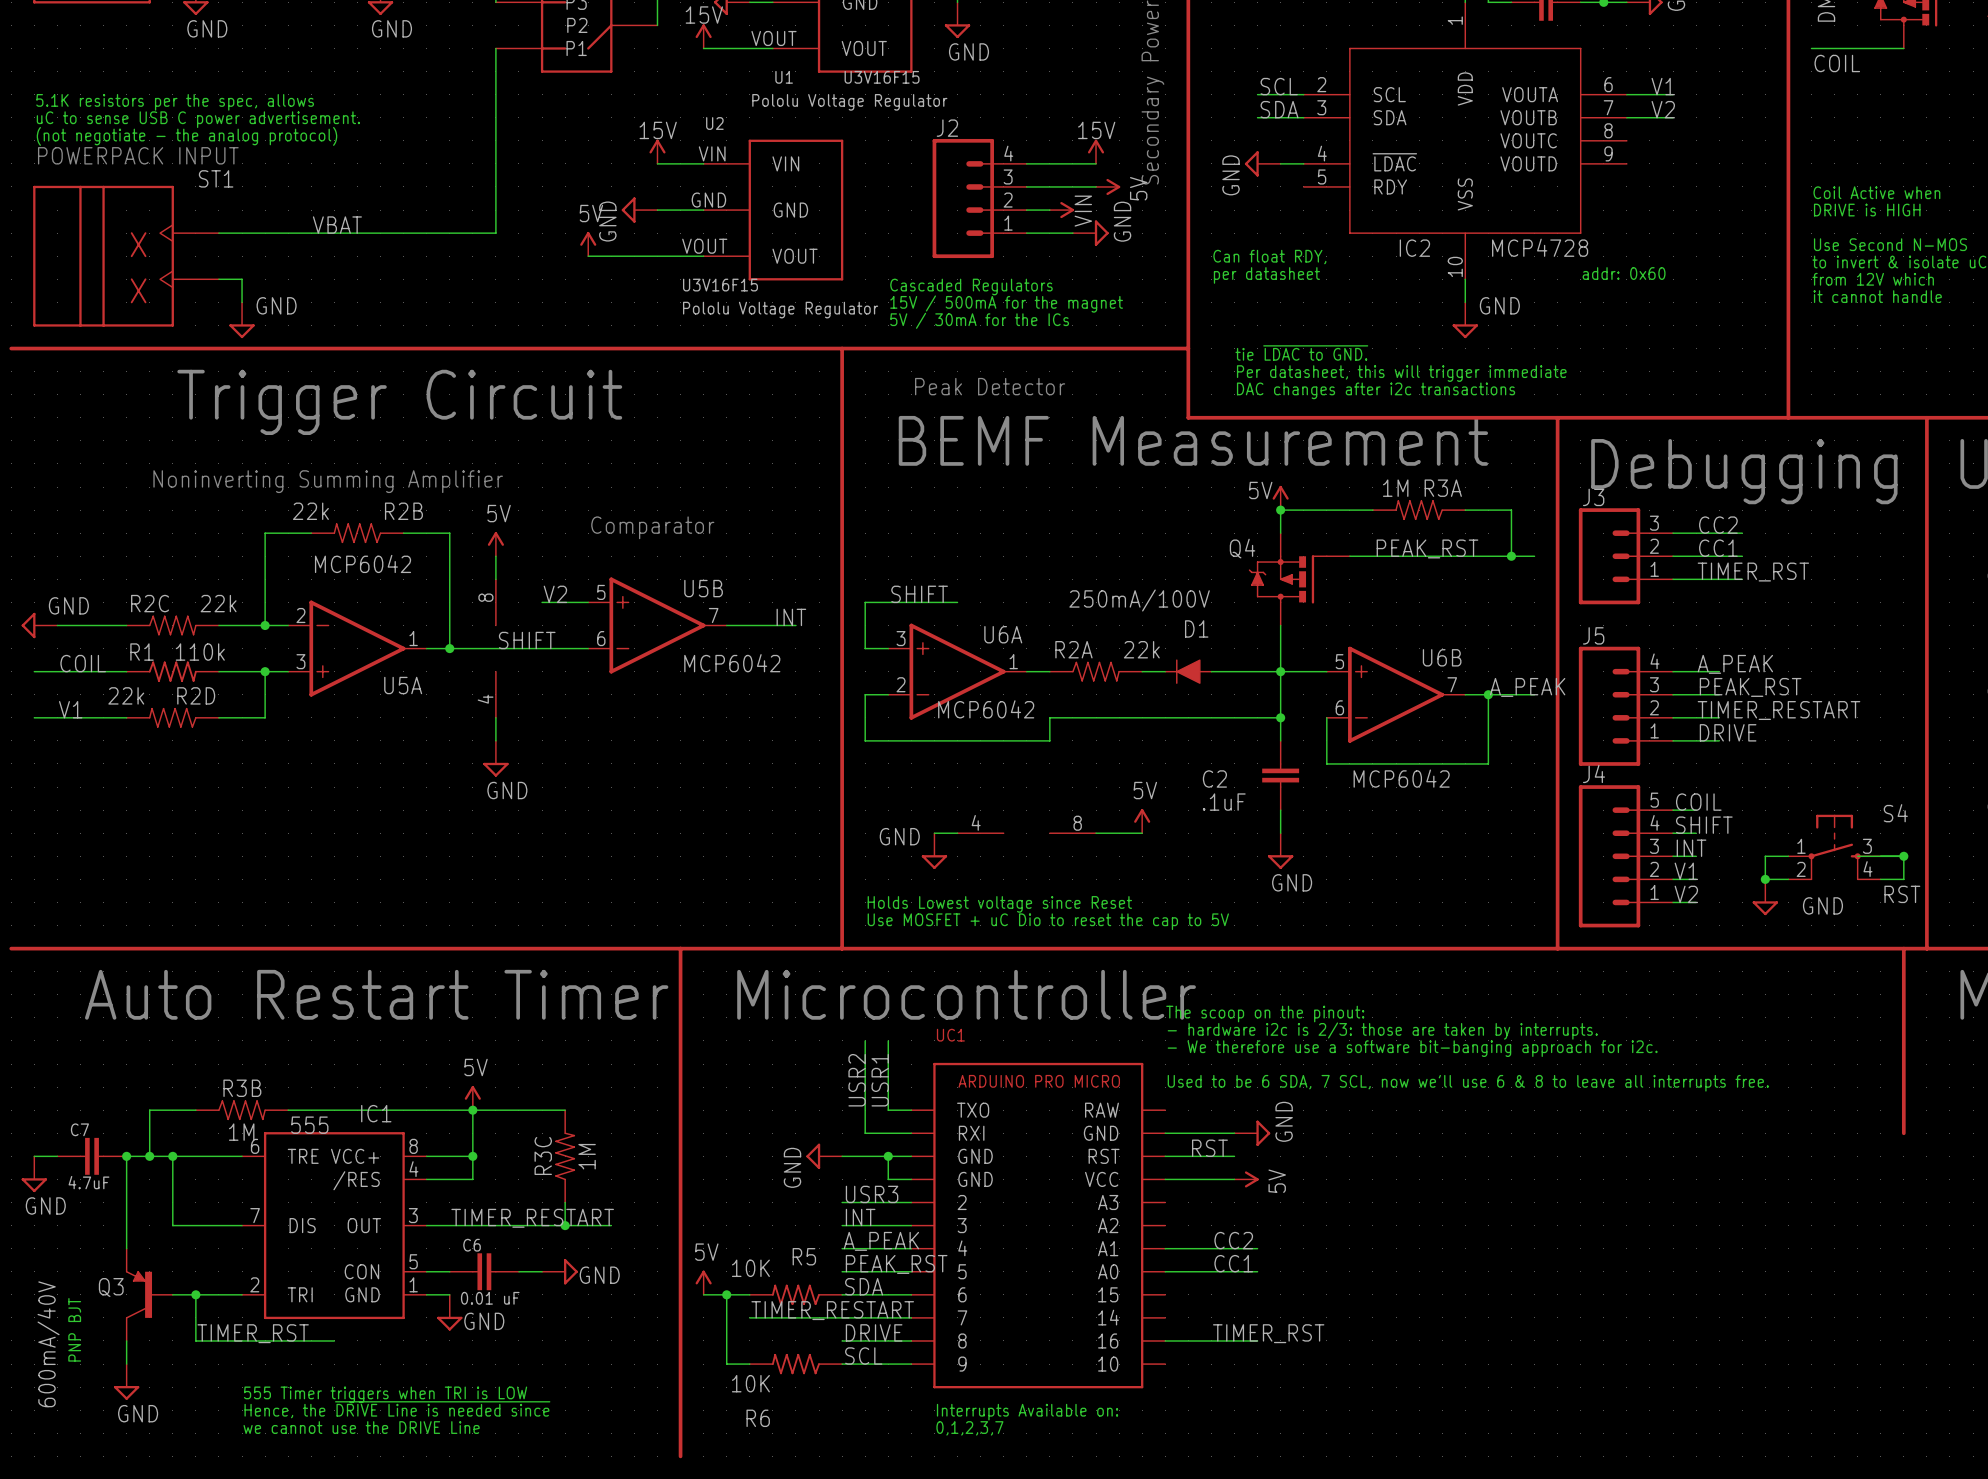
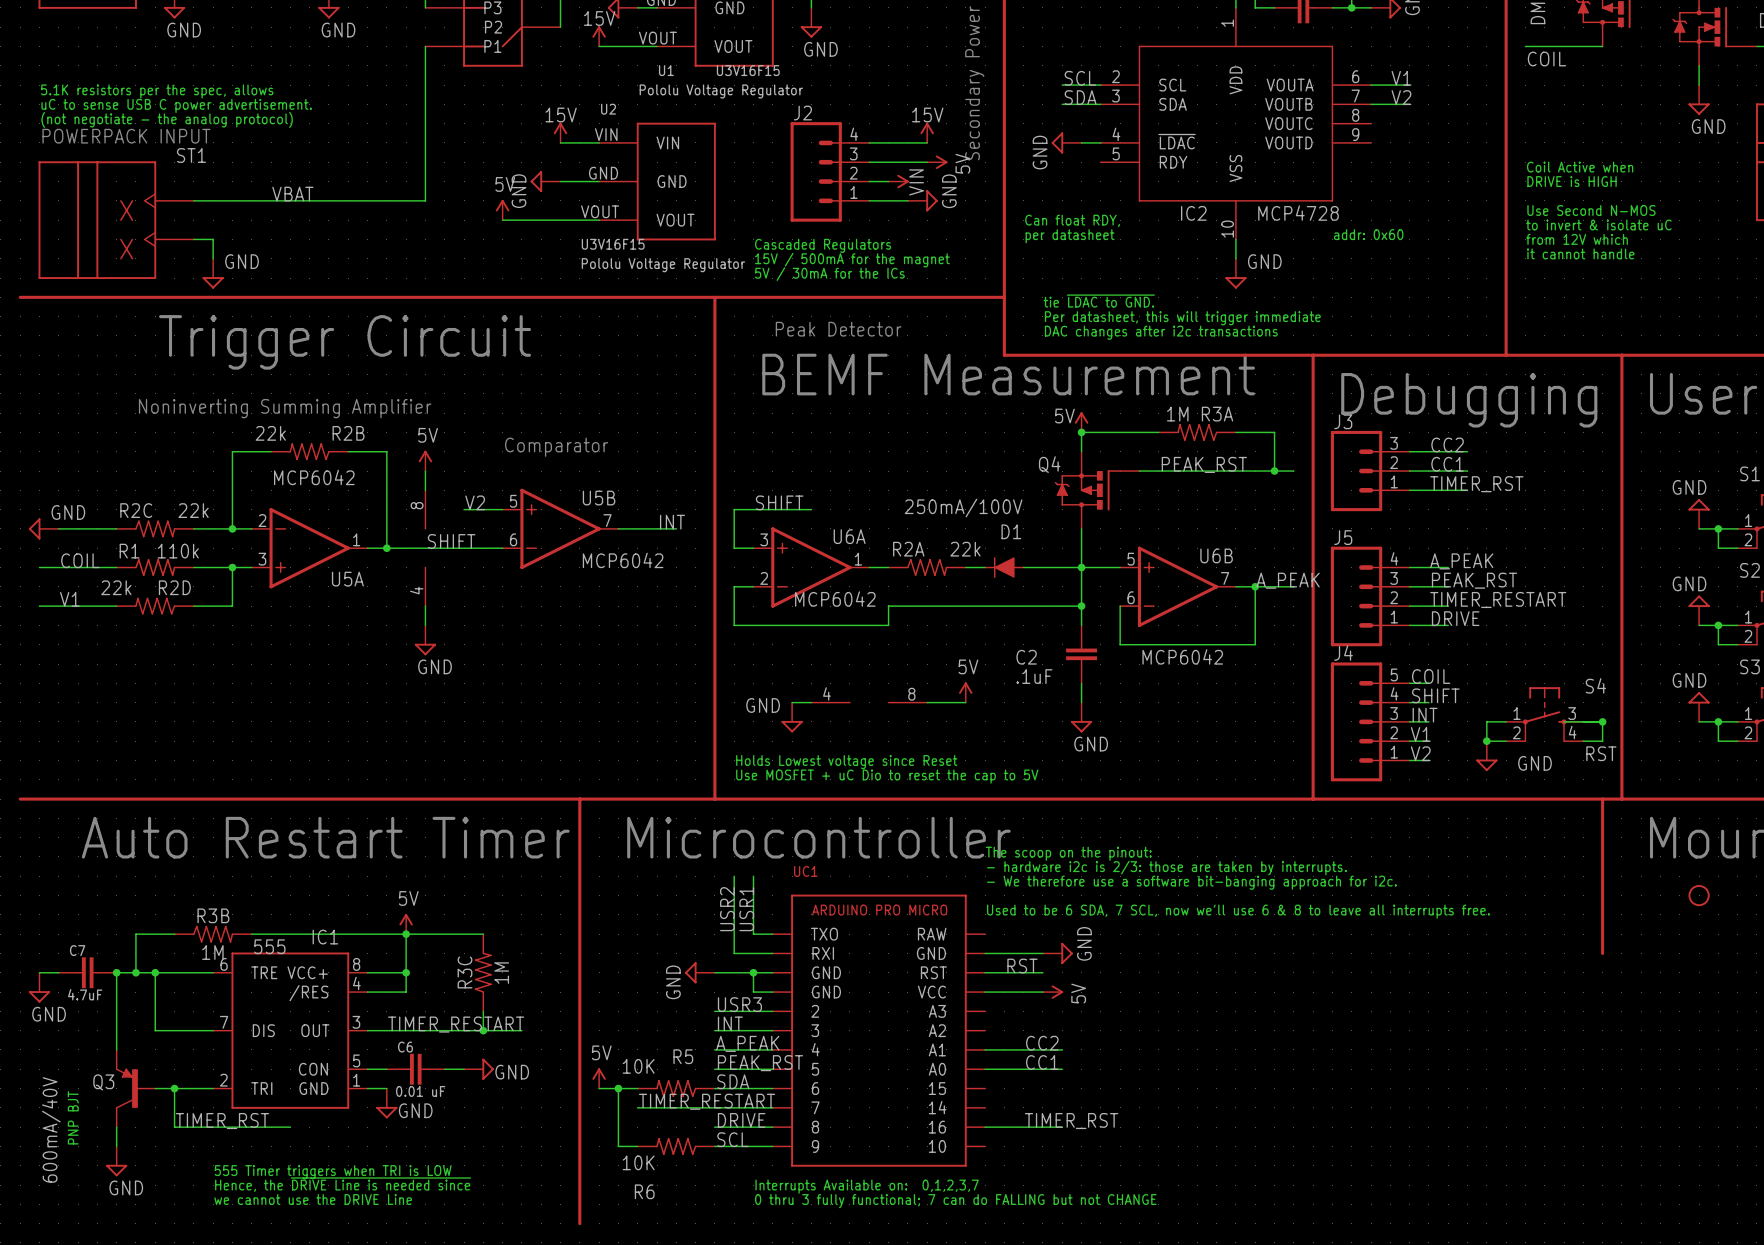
text: Interrupts Available on: (1027, 1412) -> Interrupts Available on: 0,1,2,3,7 (867, 1186)
text: 0,1,2,3,7 (969, 1428) -> none
text: none -> 0 thru 3 fully functional; 7 can do FALLING but not CHANGE (955, 1201)

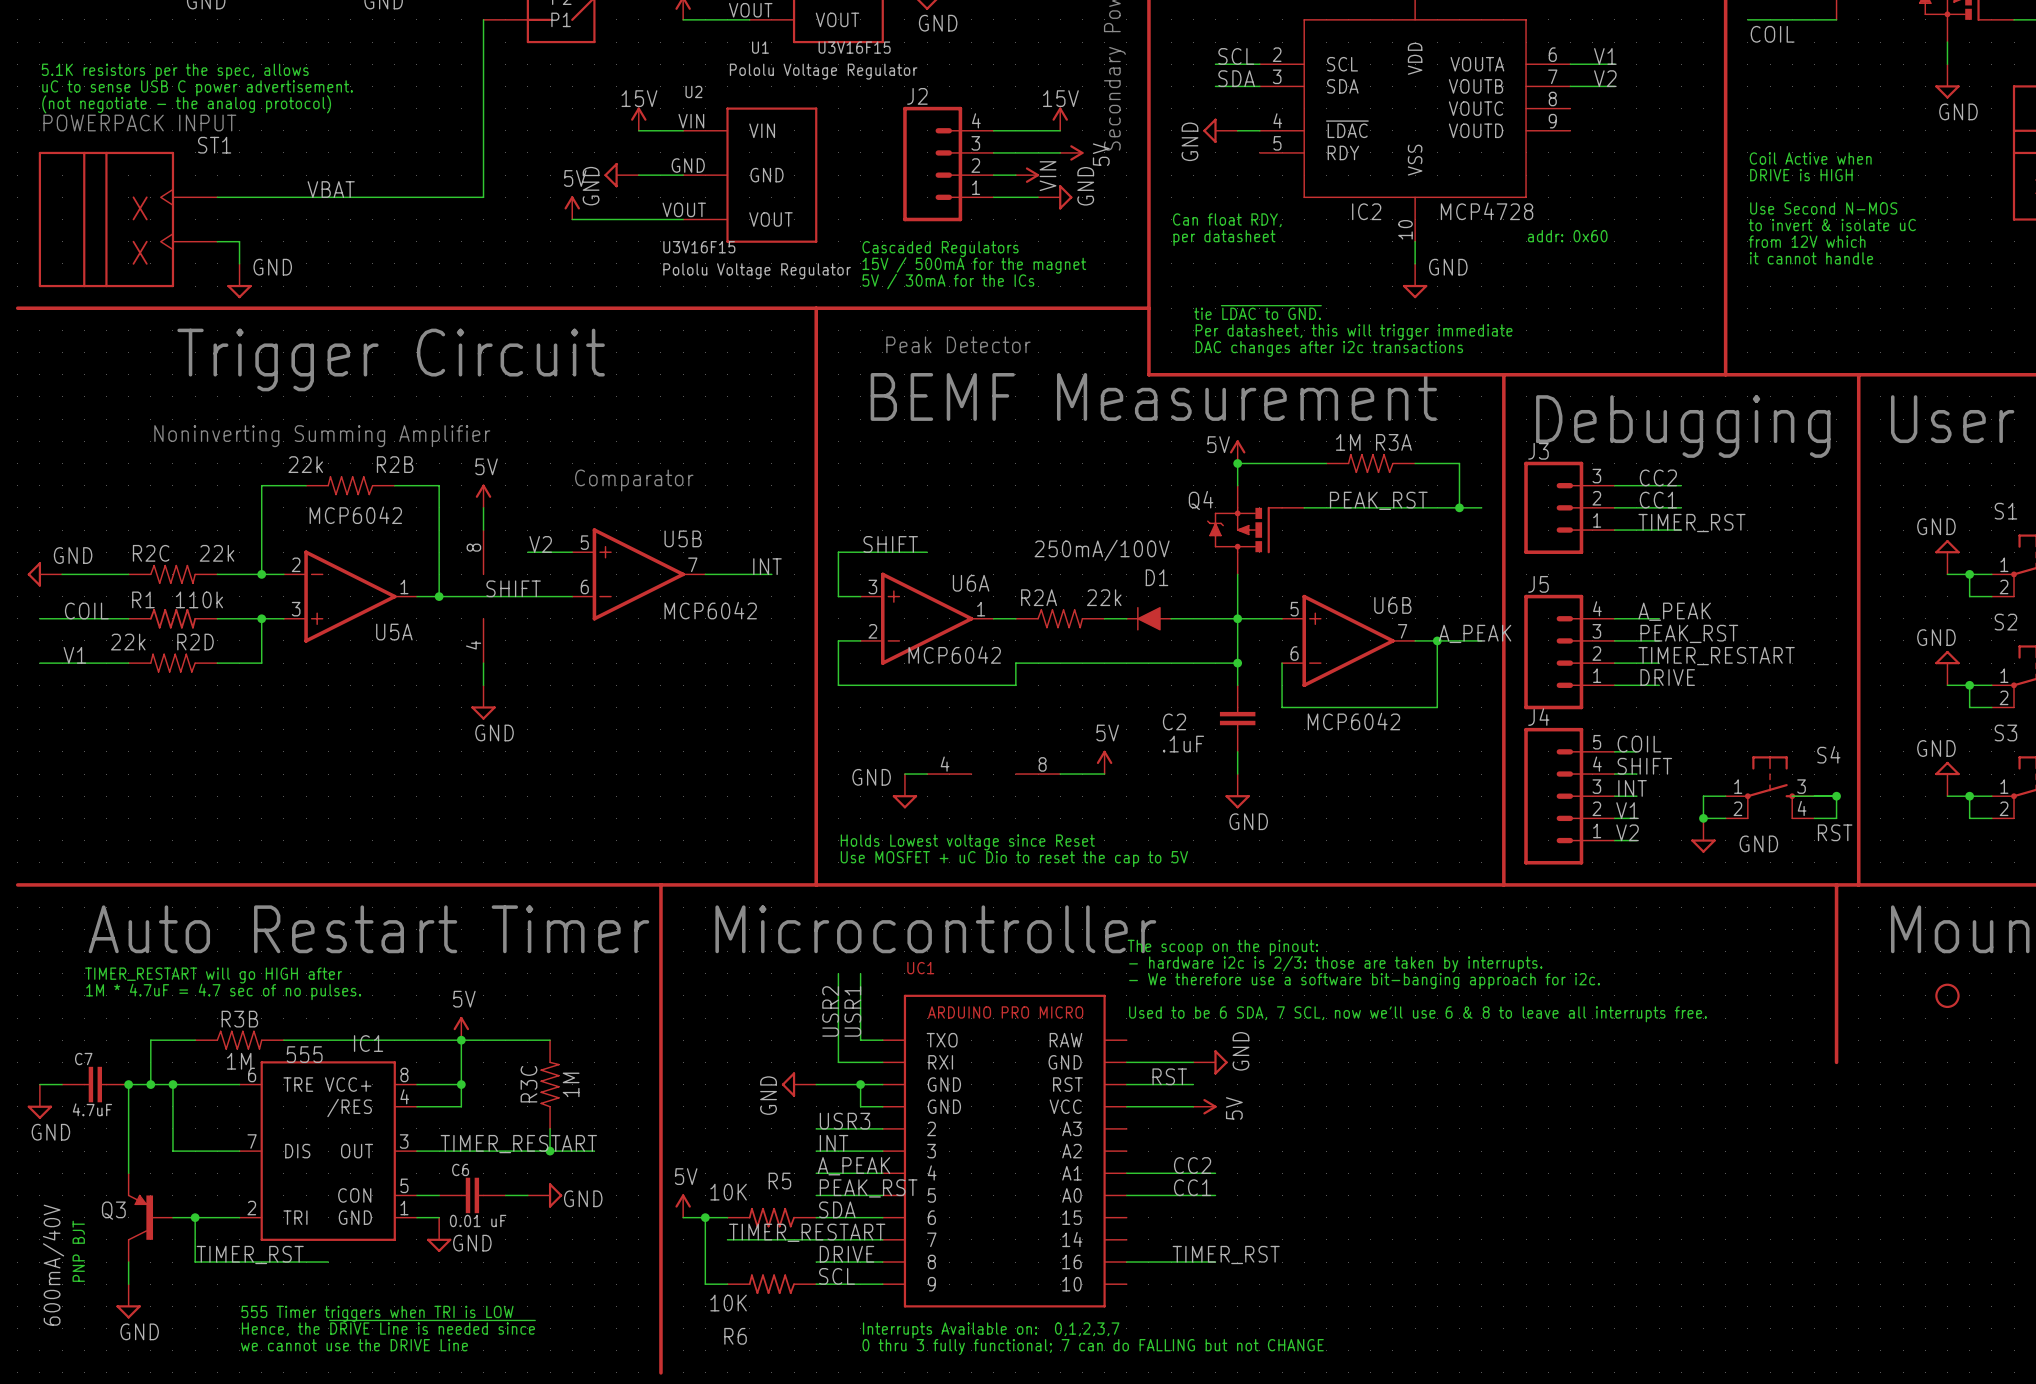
text: none -> TIMER_RESTART will go HIGH after (213, 975)
text: none -> 1M * 4.7uF = 4.7 sec of no pulses. (223, 991)

